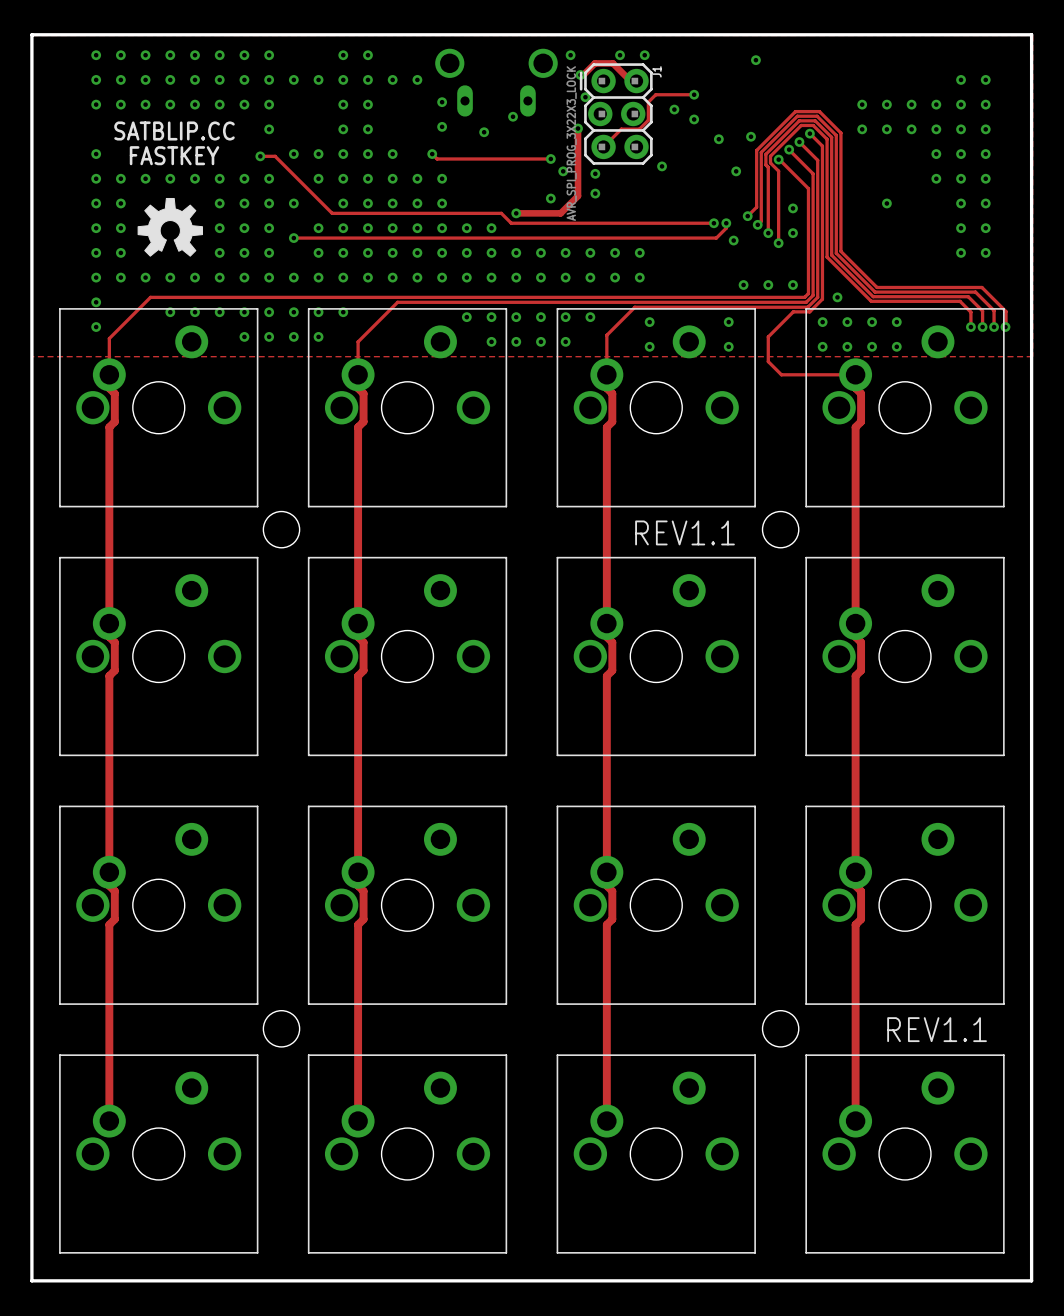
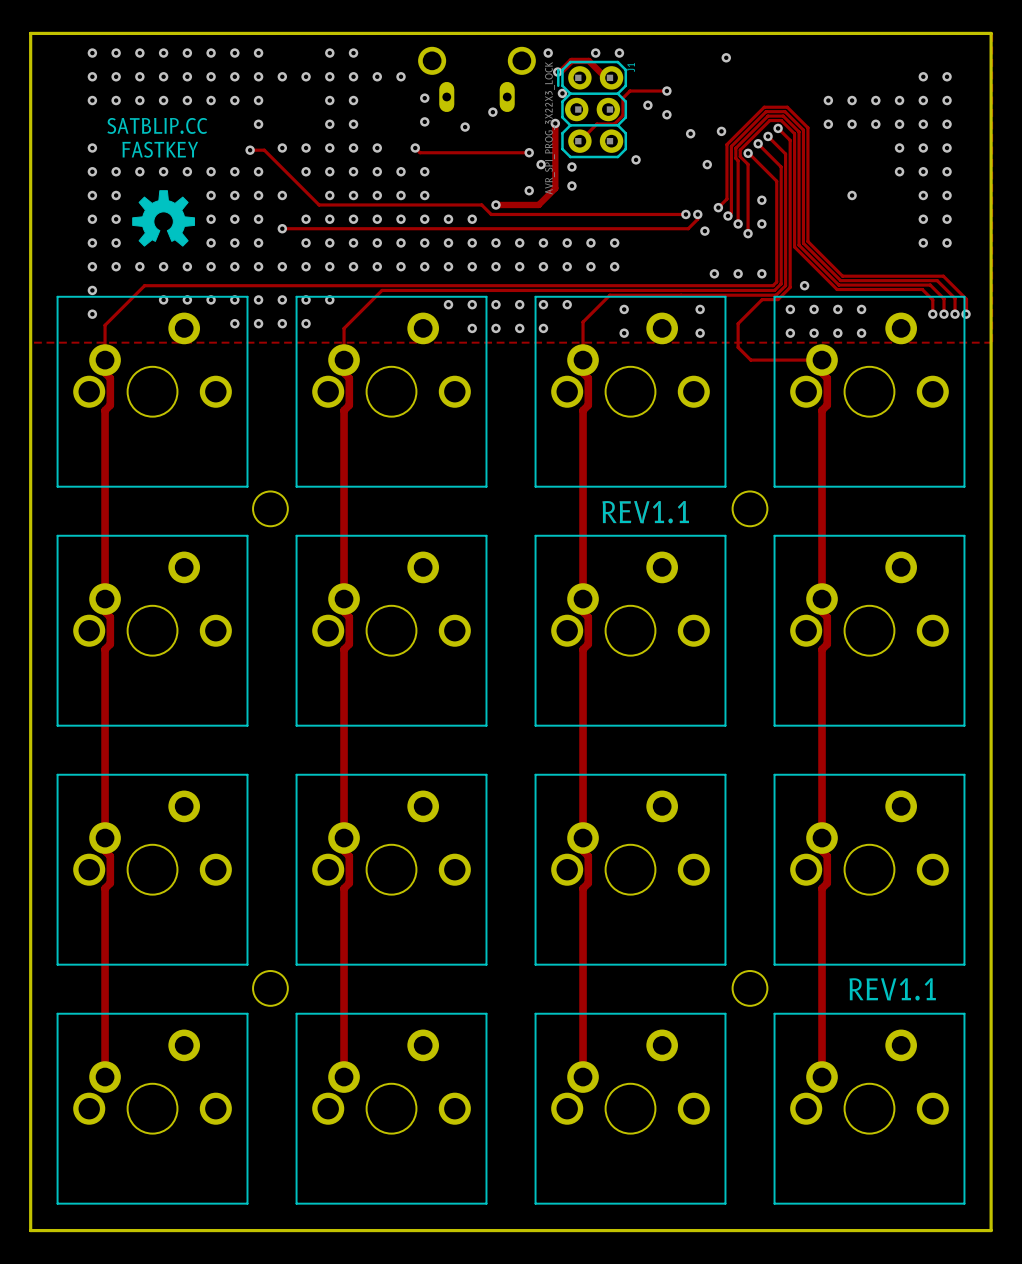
text: none -> REV1.1 (645, 512)
text: REV1.1 (684, 532) -> none

